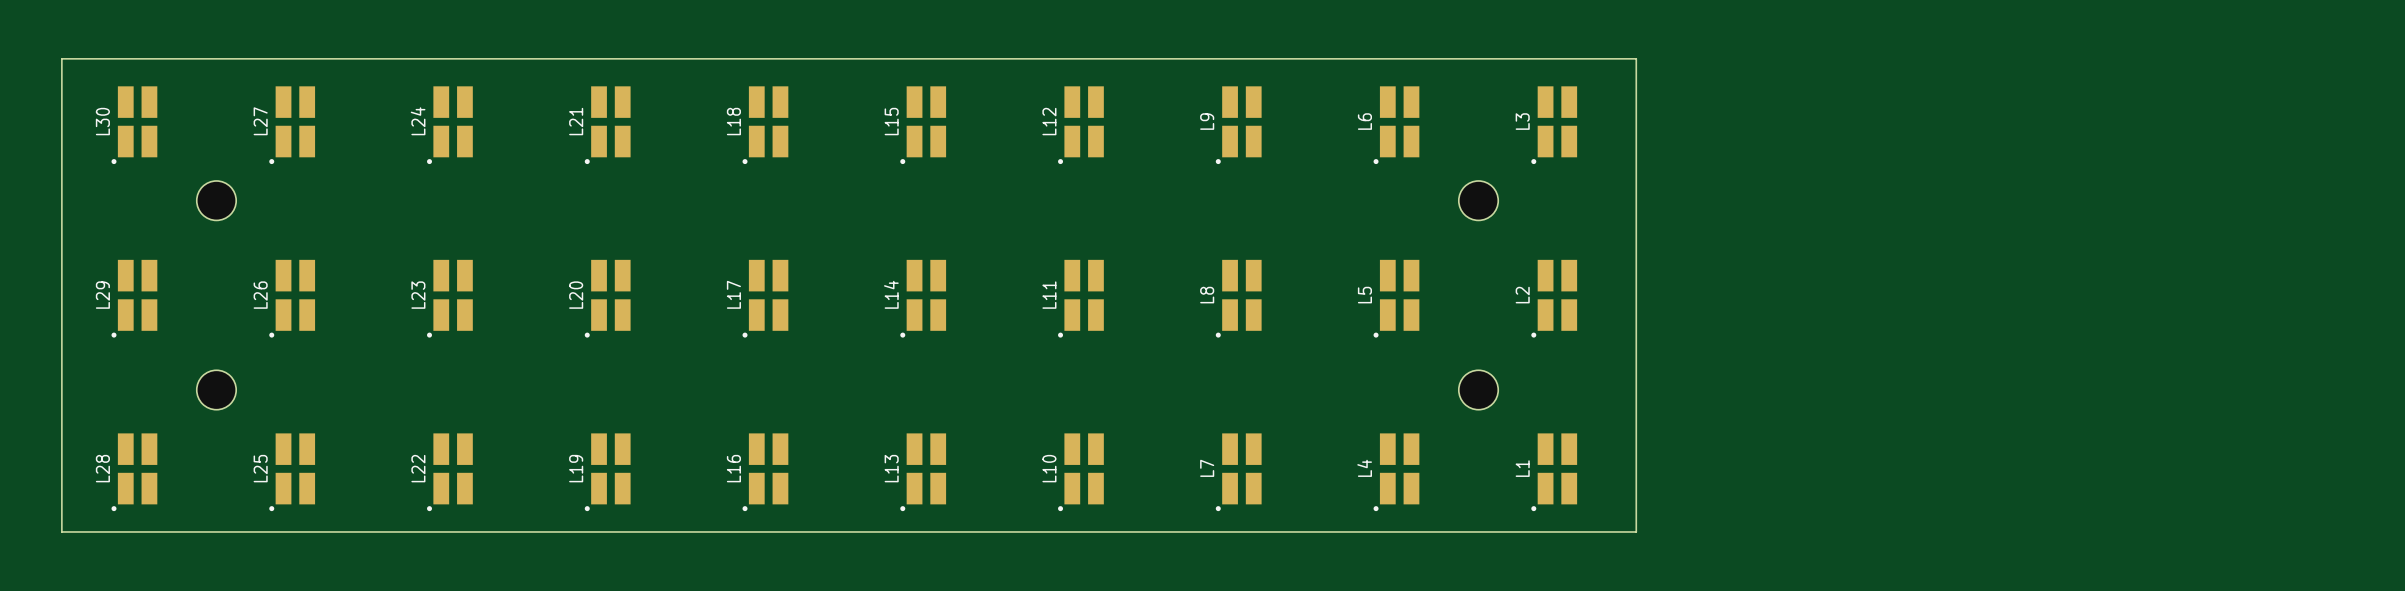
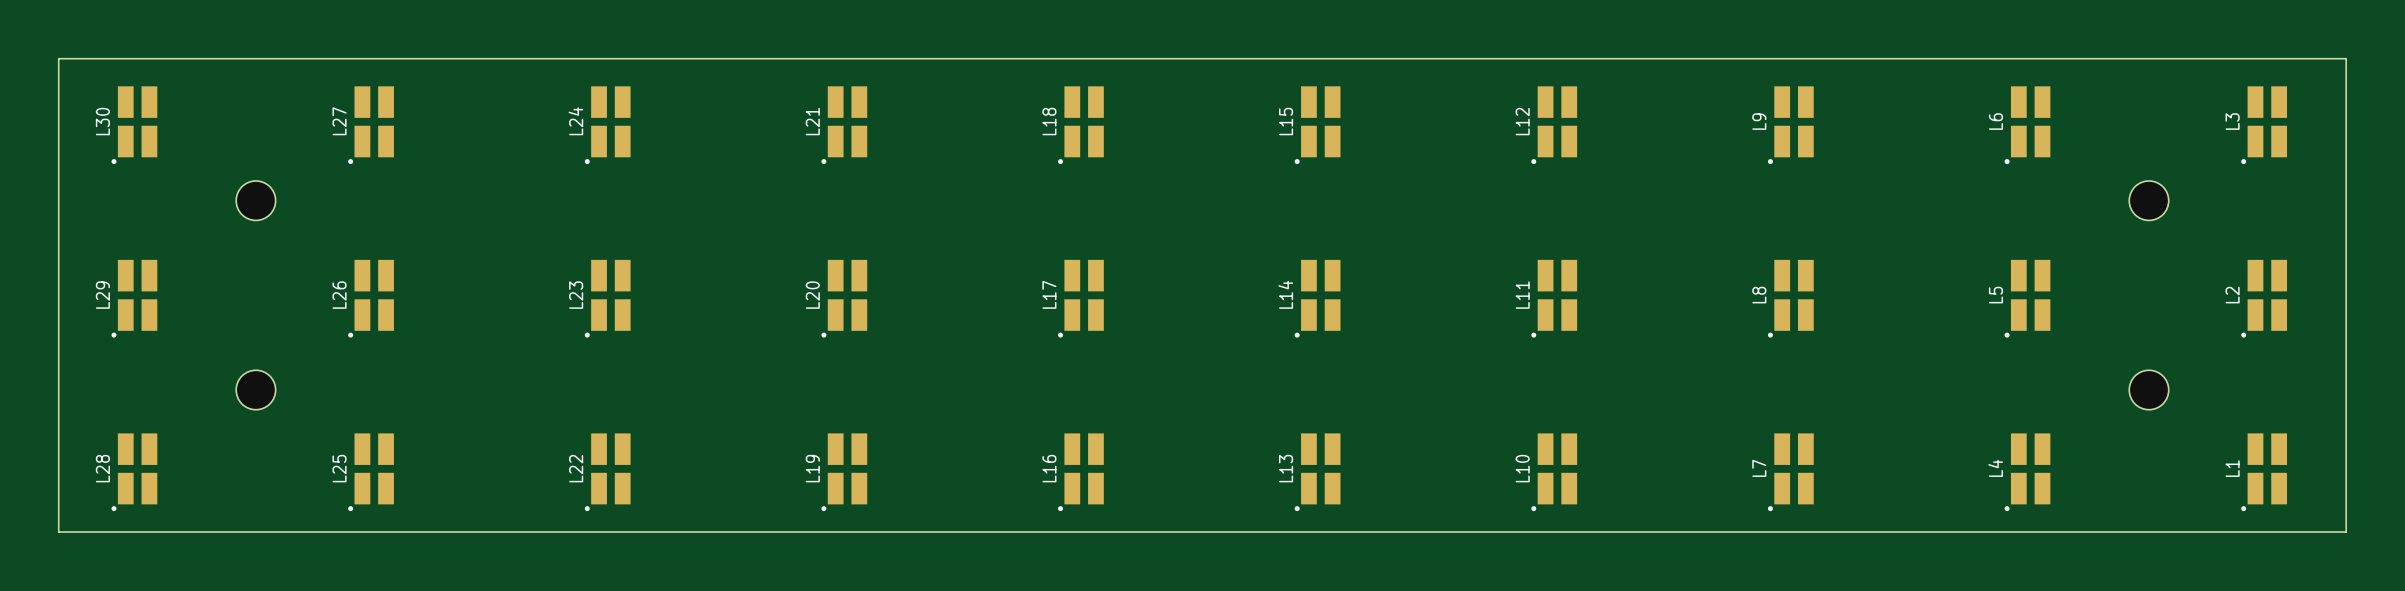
text position: L27 (260, 121) -> L27 (339, 121)
text: L24 (418, 121) -> none
text: L21 (576, 121) -> L24 (575, 121)
text: L18 (733, 121) -> none
text: none -> L21 (812, 121)
text: L15 (891, 121) -> none
text: L12 (1049, 121) -> L18 (1049, 121)
text: L9 (1207, 121) -> none
text: none -> L15 (1286, 121)
text: L6 (1364, 121) -> none
text: L3 (1522, 121) -> L12 (1522, 121)
text: none -> L9 (1759, 121)
text: none -> L6 (1995, 121)
text: none -> L3 (2232, 121)
part: (292, 125) -> none
part: none -> (371, 125)
part: (449, 125) -> none
part: (765, 125) -> none
part: none -> (844, 125)
part: (923, 125) -> none
part: (1238, 125) -> none
part: none -> (1317, 125)
part: (1396, 125) -> none
part: none -> (1790, 125)
part: none -> (2027, 125)
part: none -> (2264, 125)
hole position: (216, 200) -> (255, 200)
hole: (1478, 200) -> none
hole: none -> (2148, 200)
text: L17 (733, 294) -> none
text: L14 (891, 294) -> none
text: none -> L14 (1285, 294)
text position: L26 (260, 295) -> L26 (339, 295)
text: L23 (418, 295) -> none
text: L20 (576, 295) -> L23 (576, 295)
text: none -> L20 (812, 295)
text: L11 (1049, 295) -> L17 (1049, 294)
text: L8 (1207, 295) -> none
text: L5 (1364, 295) -> none
text: L2 (1522, 295) -> L11 (1522, 295)
text: none -> L8 (1759, 295)
text: none -> L5 (1995, 295)
text: none -> L2 (2232, 295)
part: (292, 298) -> none
part: none -> (371, 298)
part: (449, 298) -> none
part: (765, 298) -> none
part: none -> (844, 298)
part: (923, 298) -> none
part: (1238, 298) -> none
part: none -> (1317, 298)
part: (1396, 298) -> none
part: none -> (1790, 298)
part: none -> (2027, 298)
part: none -> (2264, 298)
hole position: (216, 390) -> (255, 390)
hole: (1478, 390) -> none
hole: none -> (2148, 390)
text position: L25 (260, 468) -> L25 (339, 468)
text: L22 (418, 468) -> none
text: L19 (576, 468) -> L22 (576, 468)
text: L16 (733, 468) -> none
text: none -> L19 (812, 468)
text: L13 (891, 468) -> none
text: L10 (1049, 468) -> L16 (1049, 468)
text: L7 (1207, 468) -> none
text: none -> L13 (1286, 468)
text: L4 (1364, 468) -> none
text: L1 (1522, 468) -> L10 (1522, 468)
text: none -> L7 (1759, 468)
text: none -> L4 (1995, 468)
text: none -> L1 (2232, 468)
part: (292, 472) -> none
part: none -> (371, 472)
part: (449, 472) -> none
part: (765, 472) -> none
part: none -> (844, 472)
part: (923, 472) -> none
part: (1238, 472) -> none
part: none -> (1317, 472)
part: (1396, 472) -> none
part: none -> (1790, 472)
part: none -> (2027, 472)
part: none -> (2264, 472)
board edge: (61, 531) (61, 58) (1636, 58) (1636, 531) -> (61, 531) (58, 531) (58, 58) (2346, 58) (2346, 531) (1636, 531)

